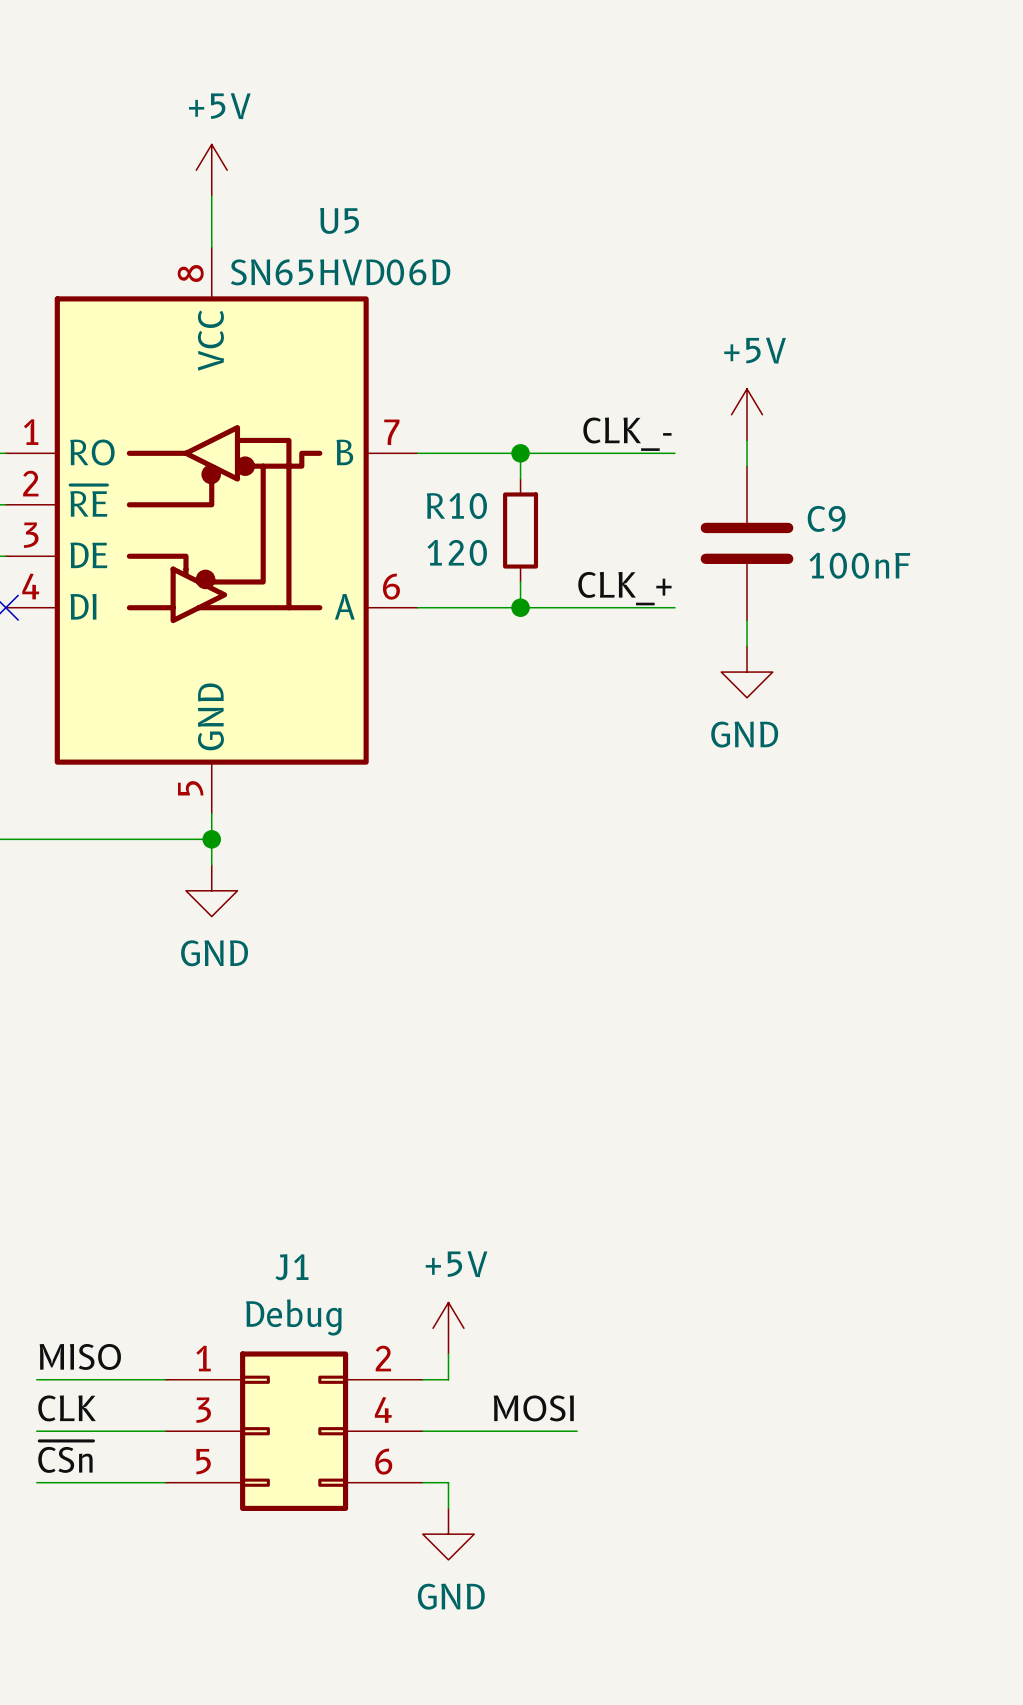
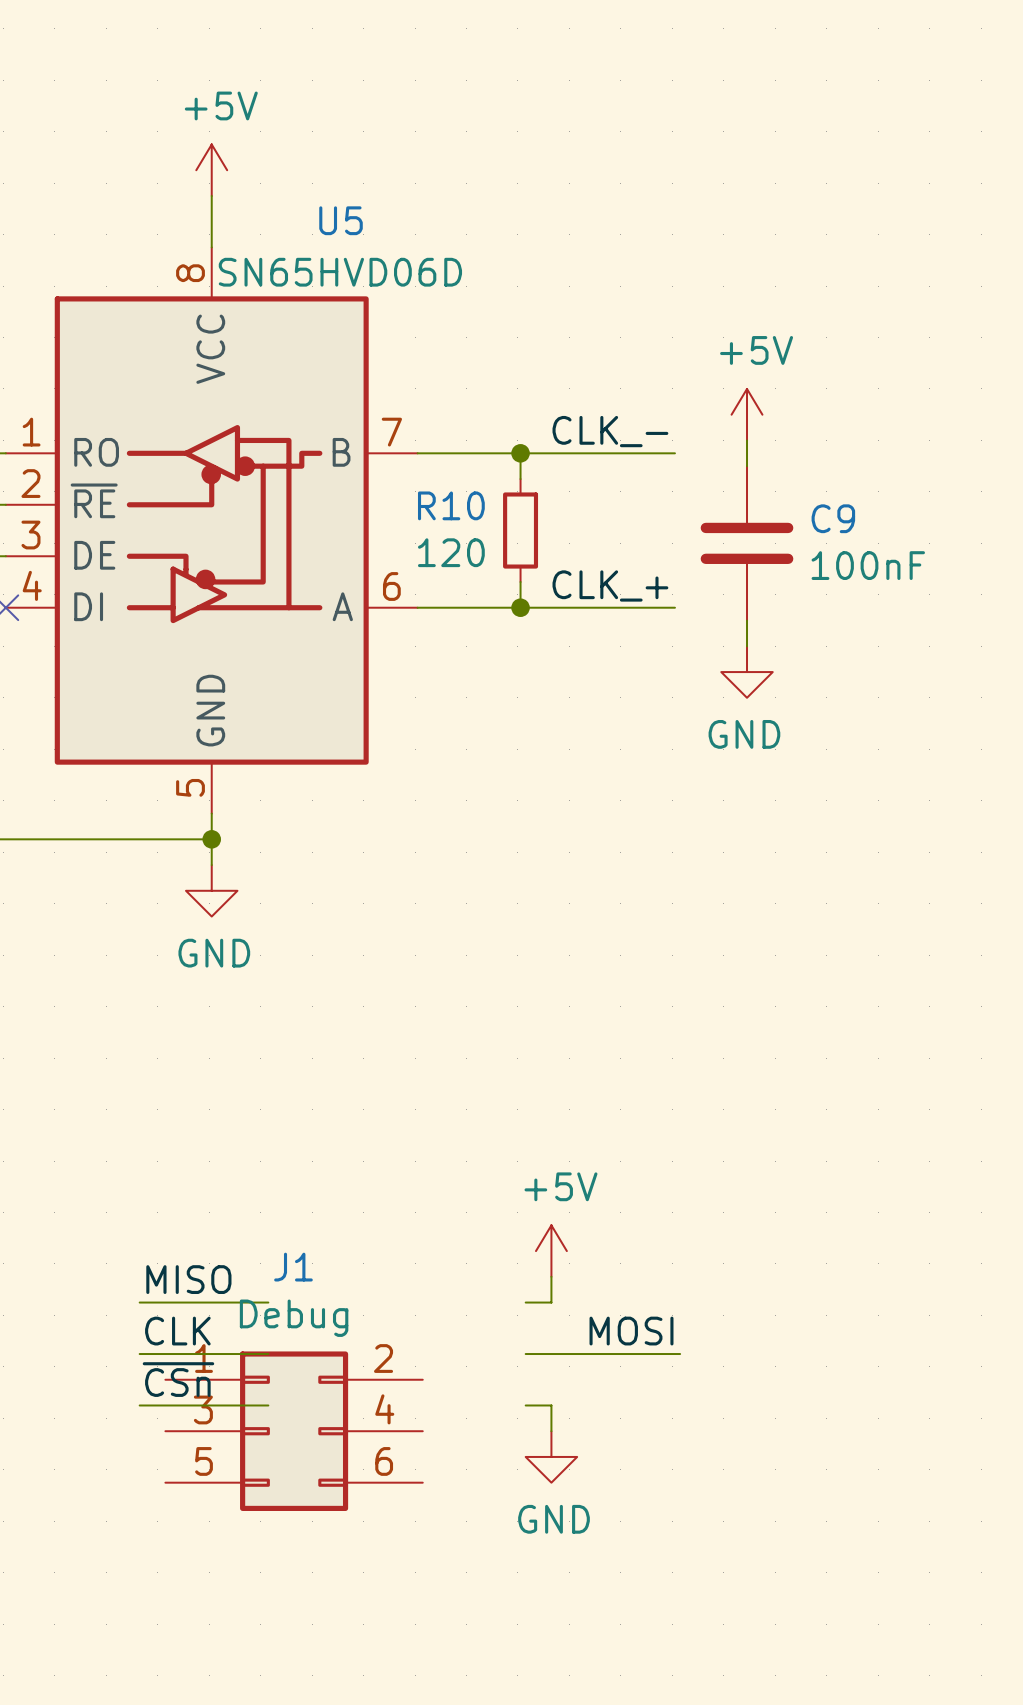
power symbol position: +5V (448, 1328) -> +5V (551, 1251)
wire: (448, 1354) (448, 1379) (422, 1379) -> (551, 1276) (551, 1302) (525, 1302)
label position: MISO (80, 1356) -> MISO (188, 1279)
wire: (36, 1379) (165, 1379) -> (139, 1302) (268, 1302)
label position: CLK (67, 1408) -> CLK (177, 1331)
label position: MOSI (533, 1408) -> MOSI (631, 1331)
wire: (36, 1431) (165, 1431) -> (139, 1354) (268, 1354)
wire: (422, 1431) (577, 1431) -> (525, 1354) (680, 1354)
label position: ~{CSn} (65, 1456) -> ~{CSn} (178, 1379)
wire: (36, 1482) (165, 1482) -> (139, 1405) (268, 1405)
wire: (422, 1482) (448, 1482) (448, 1508) -> (525, 1405) (551, 1405) (551, 1431)
power symbol position: GND (448, 1534) -> GND (551, 1456)

